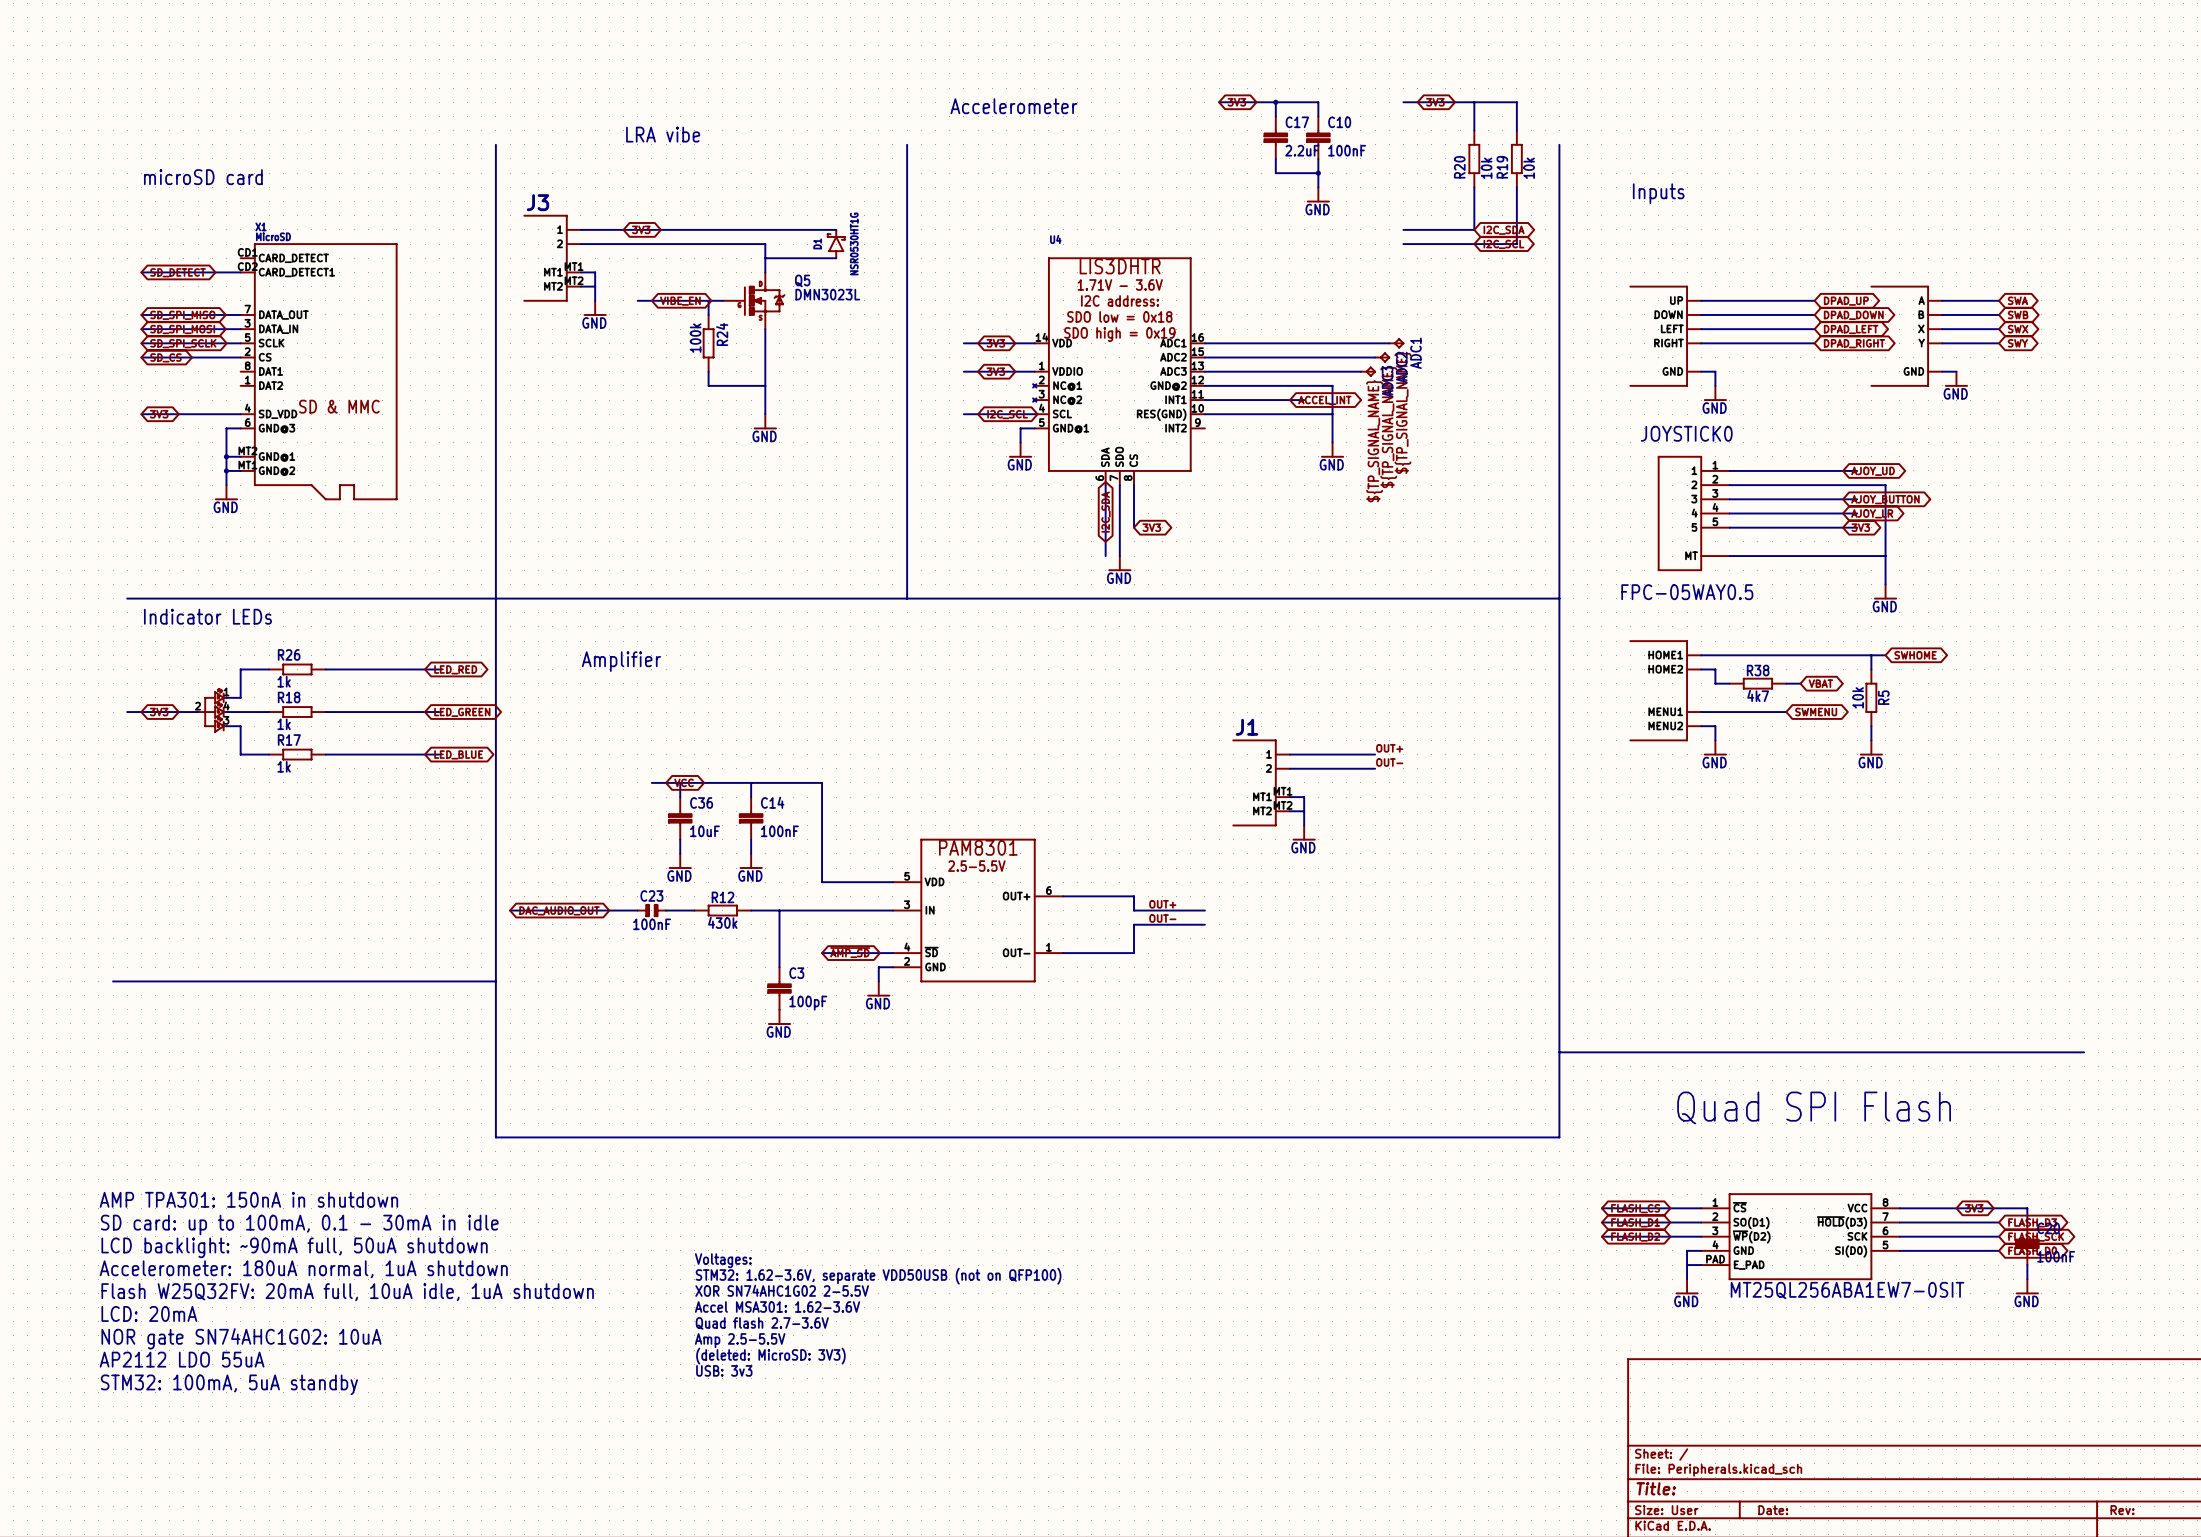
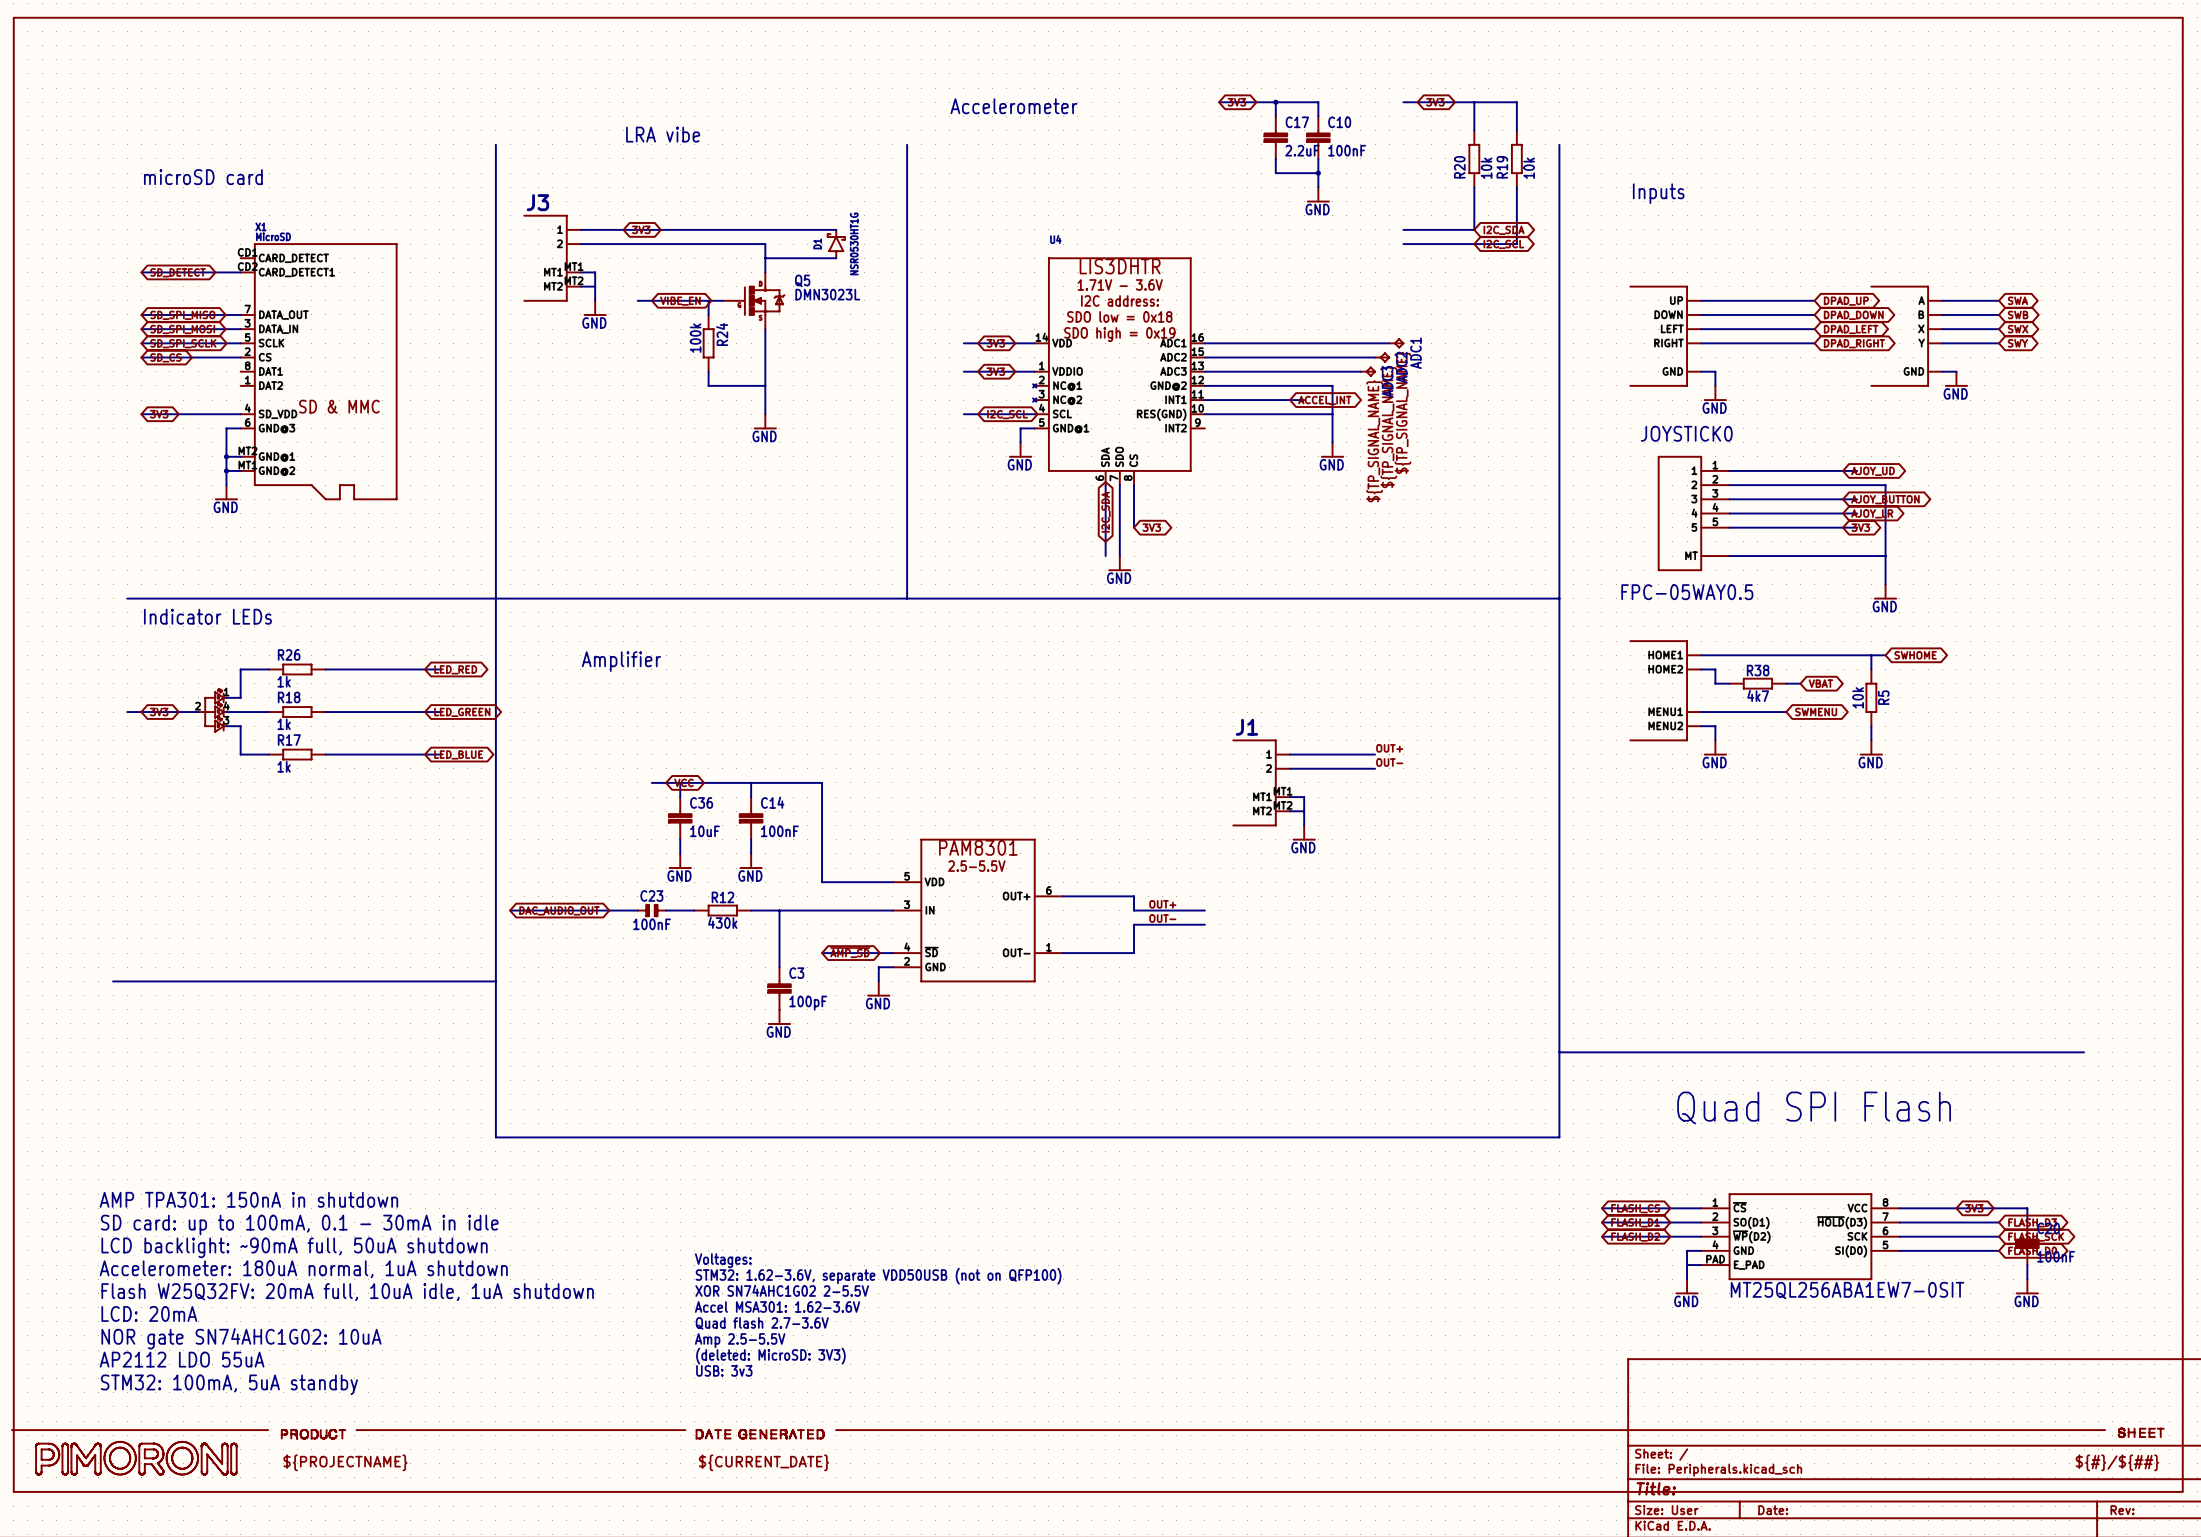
power symbol: none -> (1097, 754)

